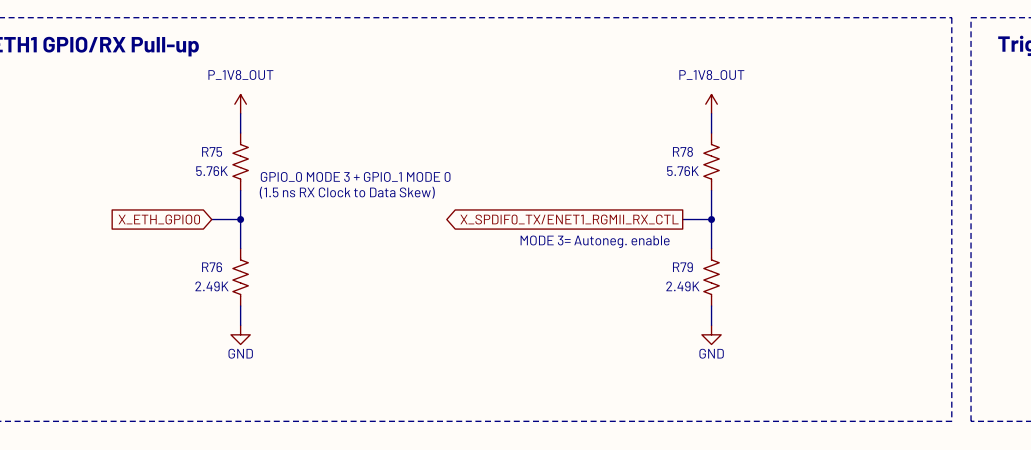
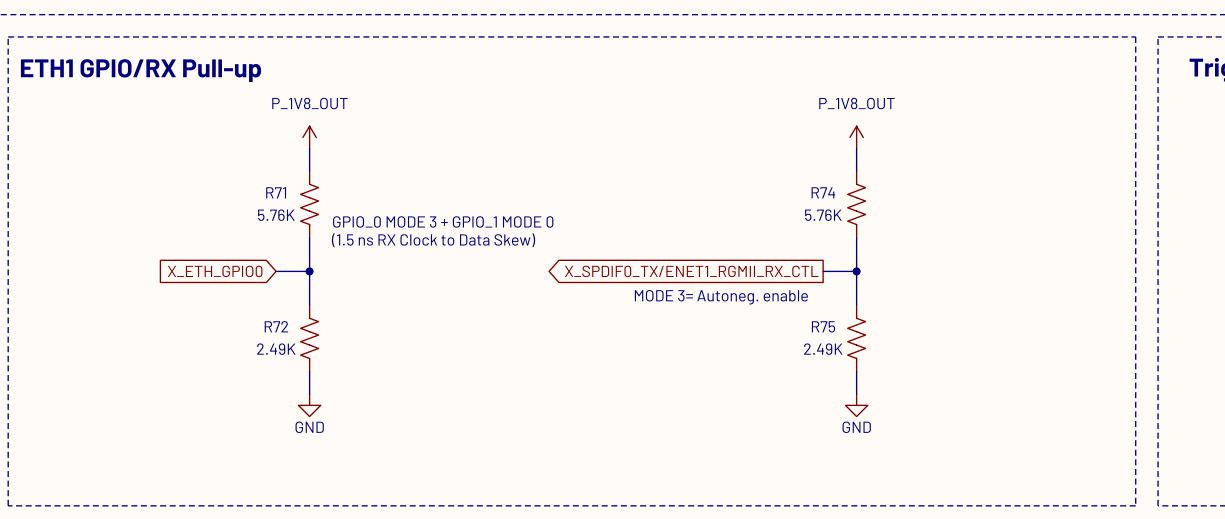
R75 name: R75 (212, 151) -> R71 (276, 192)
R78 name: R78 (682, 151) -> R74 (823, 192)
R76 name: R76 (212, 267) -> R72 (276, 326)
R79 name: R79 (682, 267) -> R75 (823, 326)

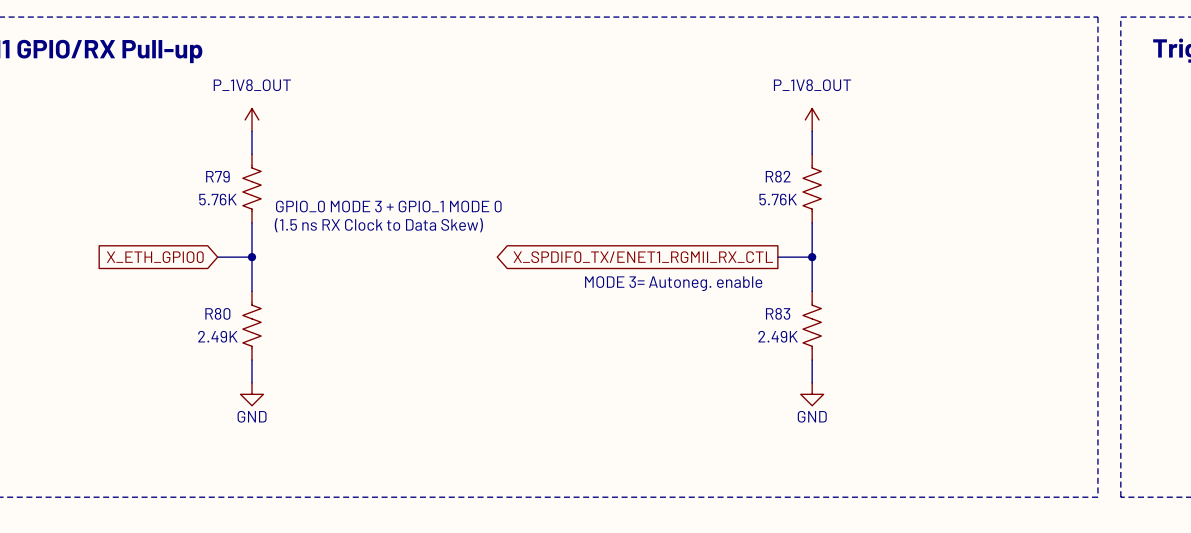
R71 name: R71 (276, 192) -> R79 (217, 176)
R74 name: R74 (823, 192) -> R82 (778, 176)
R72 name: R72 (276, 326) -> R80 (217, 313)
R75 name: R75 (823, 326) -> R83 (778, 313)

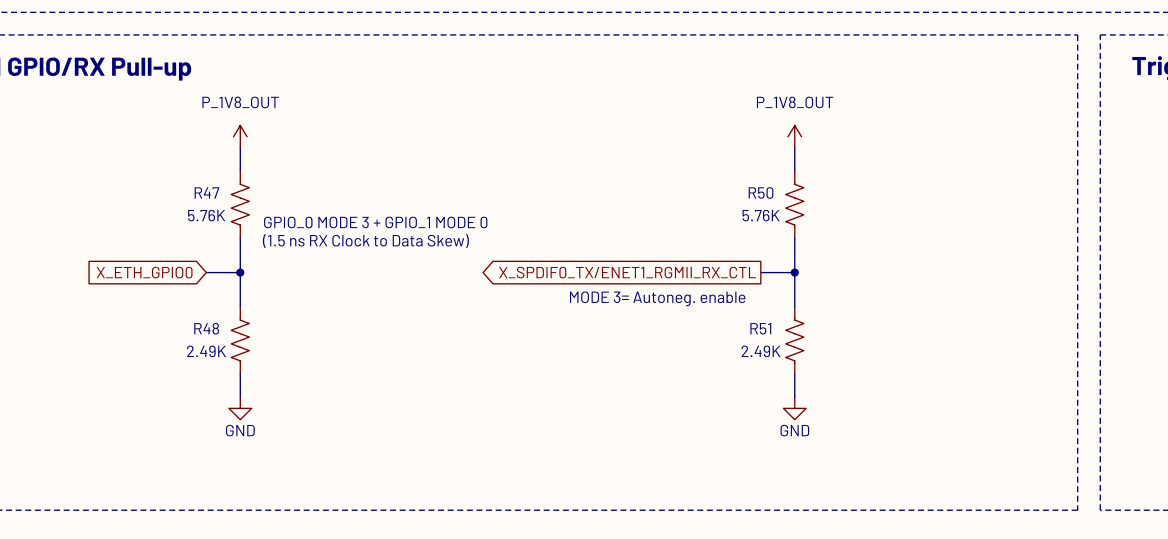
R79 name: R79 (217, 176) -> R47 (206, 192)
R82 name: R82 (778, 176) -> R50 (761, 192)
R80 name: R80 (217, 313) -> R48 (206, 328)
R83 name: R83 (778, 313) -> R51 (760, 328)

